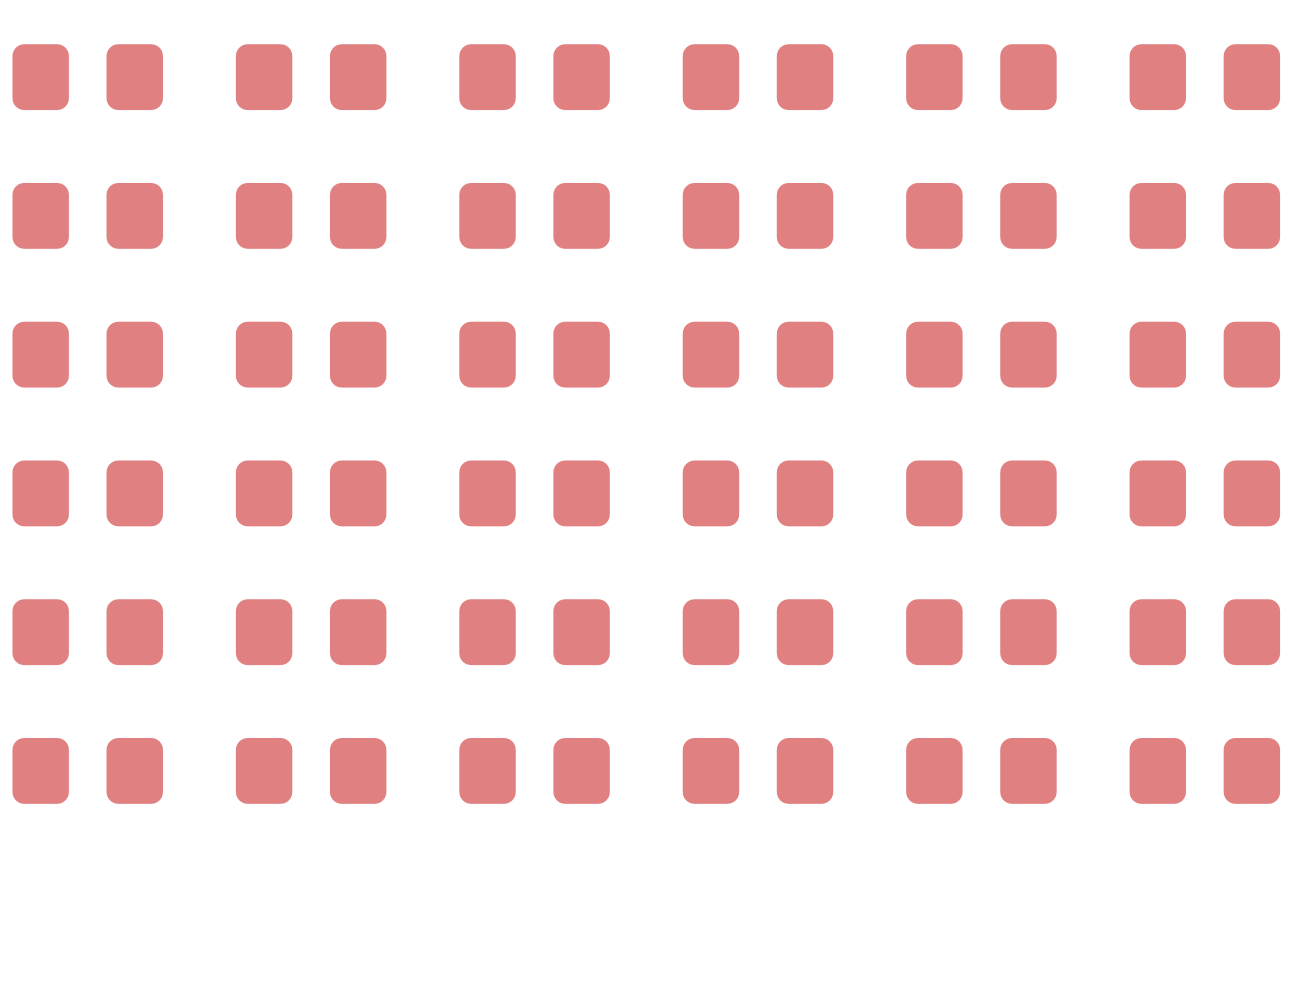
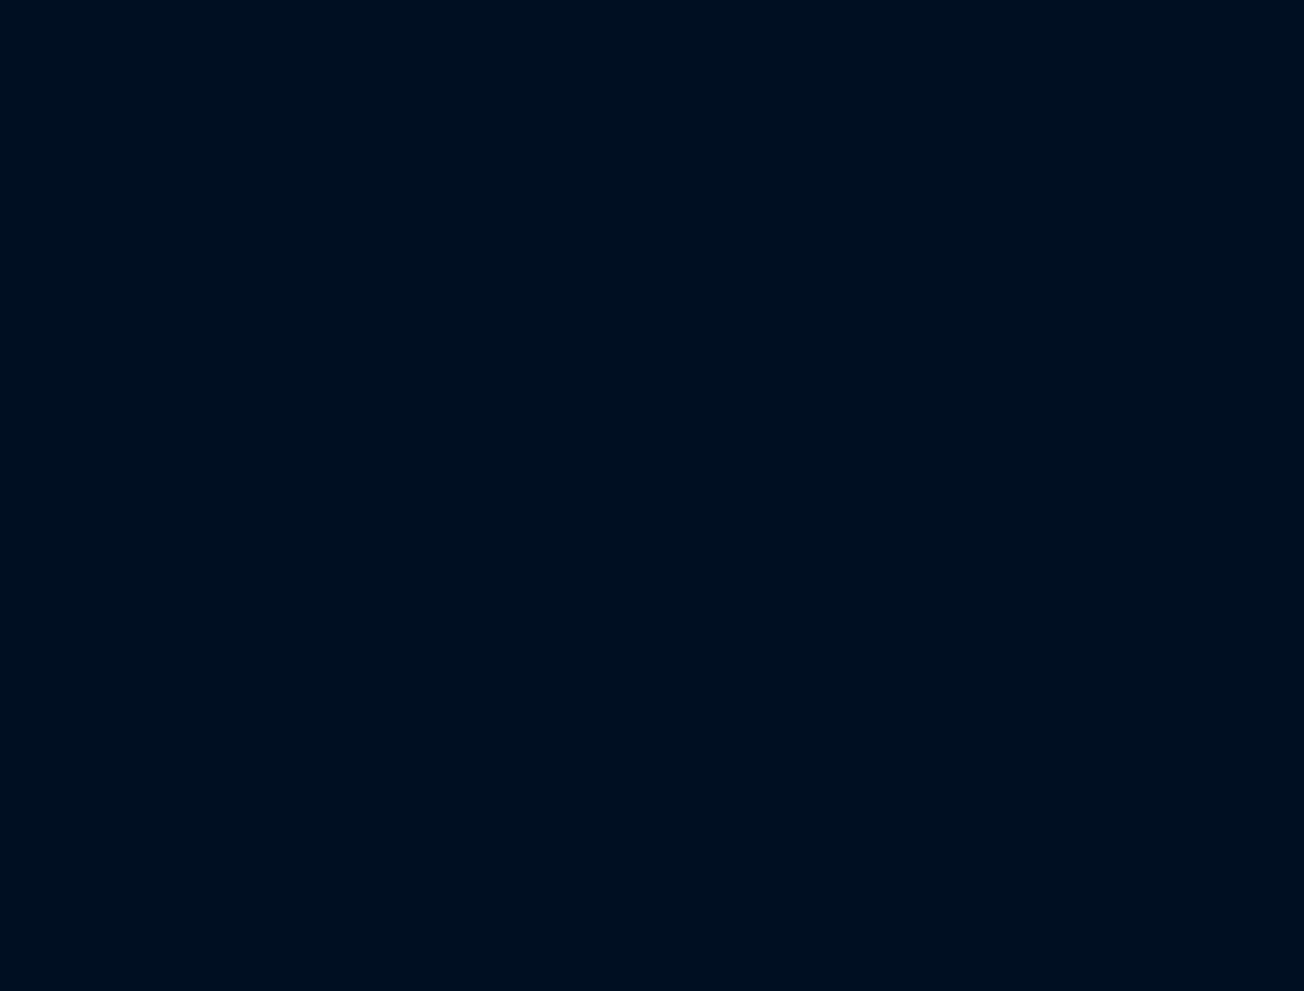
part: (87, 77) -> none
part: (311, 77) -> none
part: (534, 77) -> none
part: (757, 77) -> none
part: (981, 77) -> none
part: (1204, 77) -> none
part: (87, 215) -> none
part: (311, 215) -> none
part: (534, 215) -> none
part: (757, 215) -> none
part: (981, 215) -> none
part: (1204, 215) -> none
part: (87, 354) -> none
part: (311, 354) -> none
part: (534, 354) -> none
part: (757, 354) -> none
part: (981, 354) -> none
part: (1204, 354) -> none
part: (87, 493) -> none
part: (311, 493) -> none
part: (534, 493) -> none
part: (757, 493) -> none
part: (981, 493) -> none
part: (1204, 493) -> none
part: (87, 632) -> none
part: (311, 632) -> none
part: (534, 632) -> none
part: (757, 632) -> none
part: (981, 632) -> none
part: (1204, 632) -> none
part: (87, 770) -> none
part: (311, 770) -> none
part: (534, 770) -> none
part: (757, 770) -> none
part: (981, 770) -> none
part: (1204, 770) -> none

